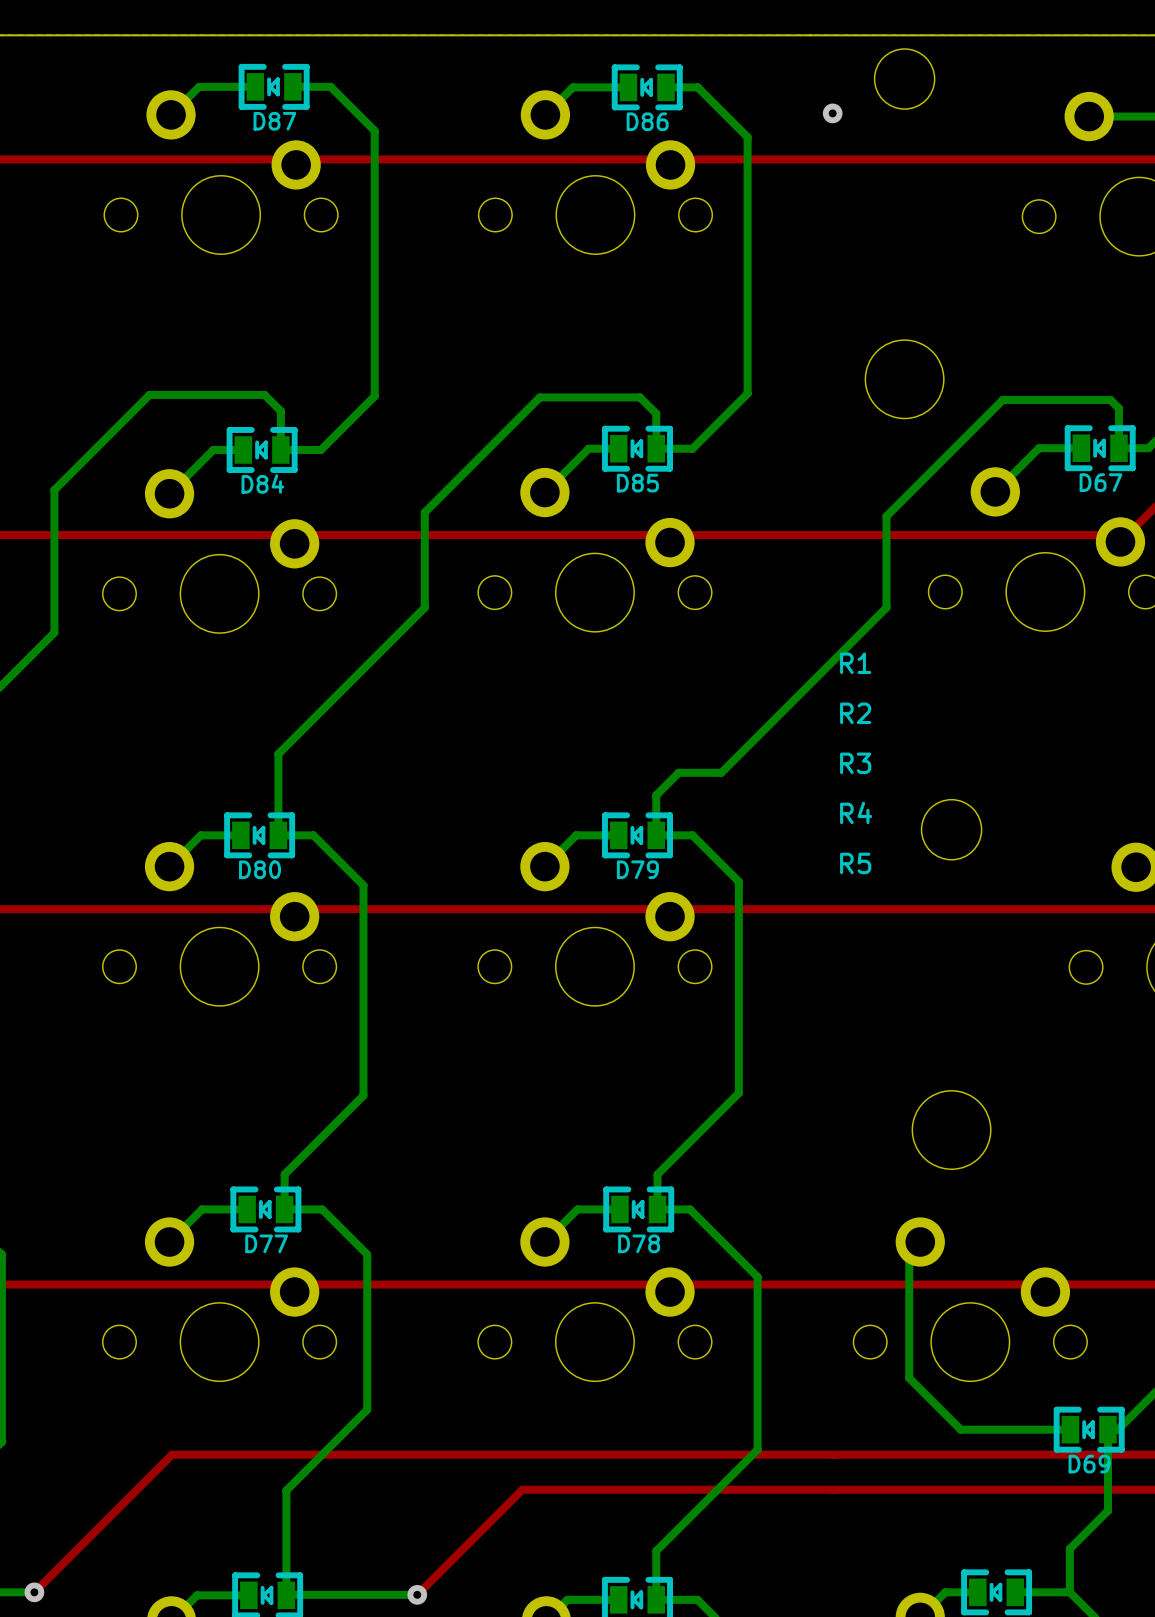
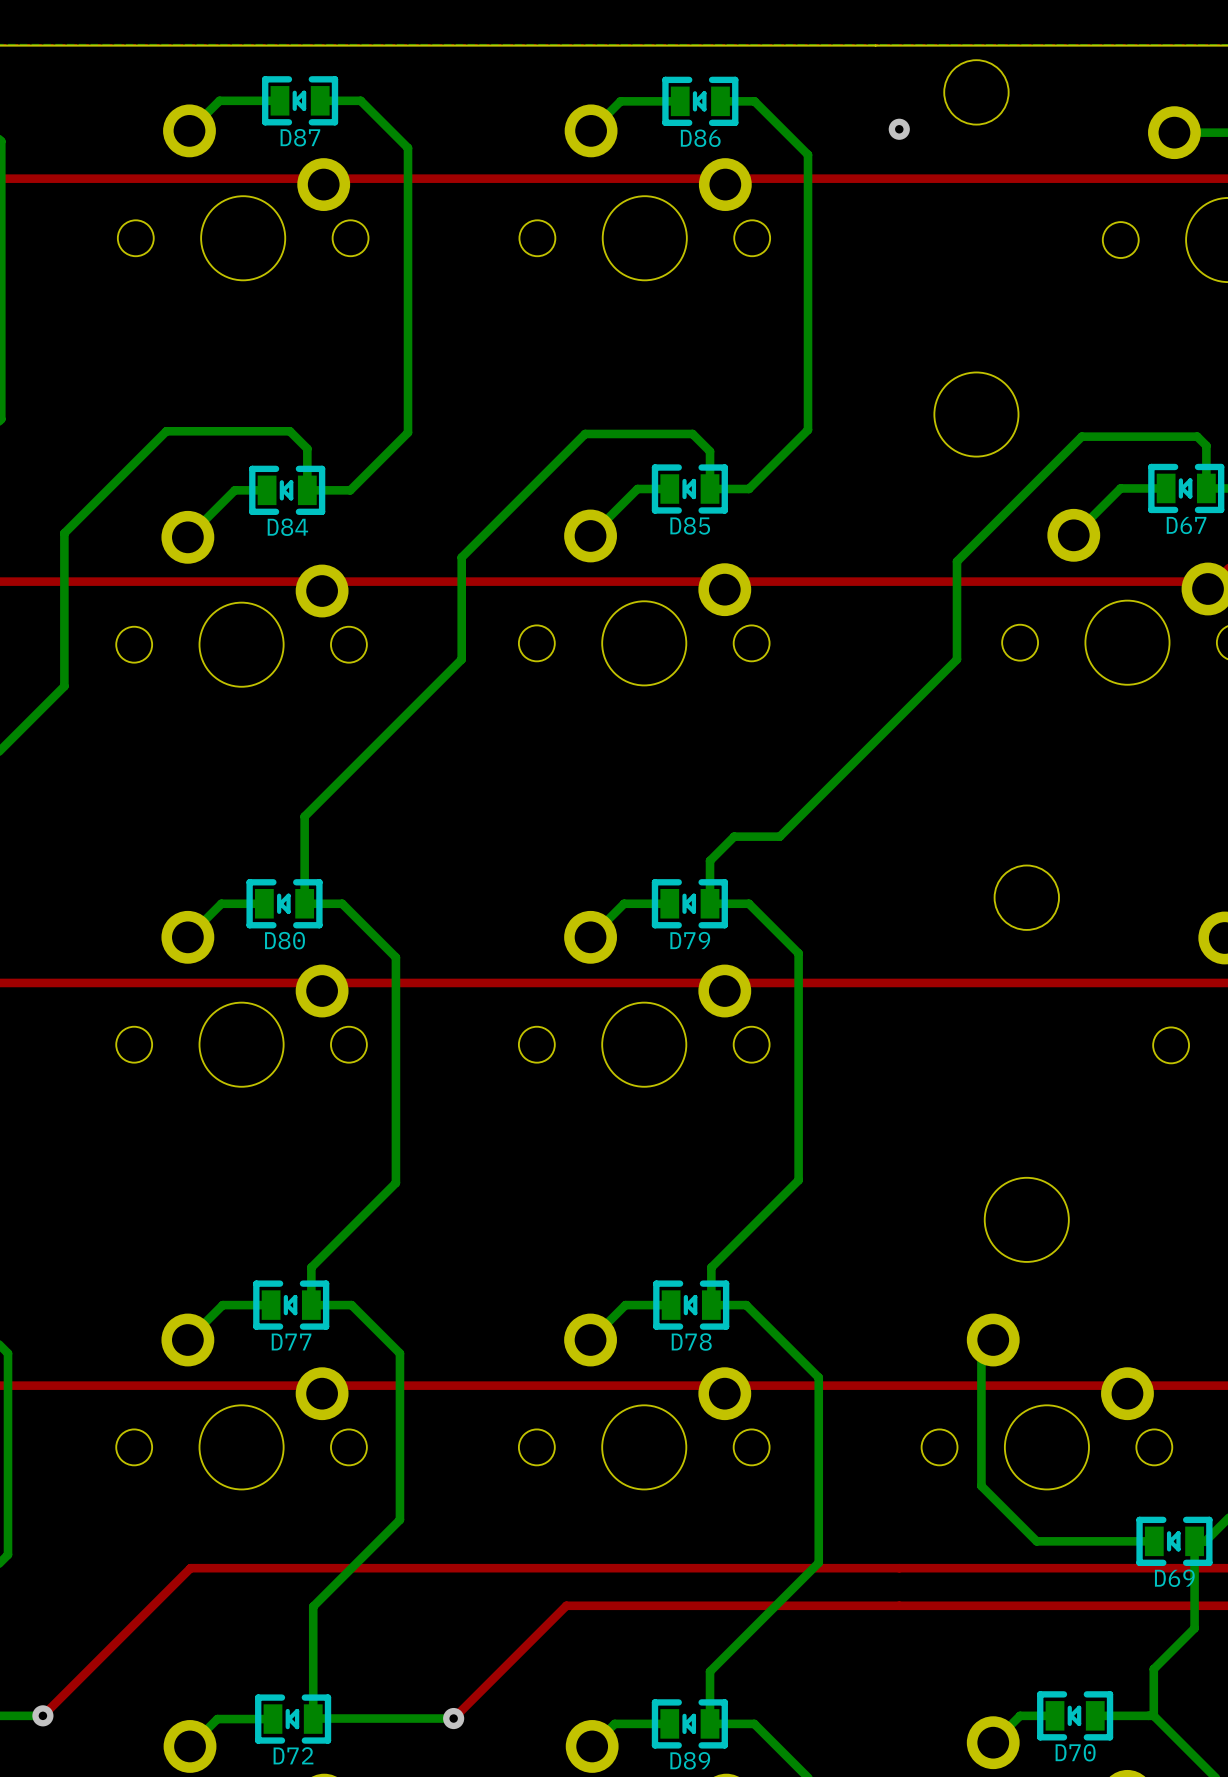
text: R1 (855, 663) -> none
text: R2 (855, 713) -> none
text: R3 (855, 763) -> none
text: R4 (856, 812) -> none
text: R5 (855, 863) -> none

